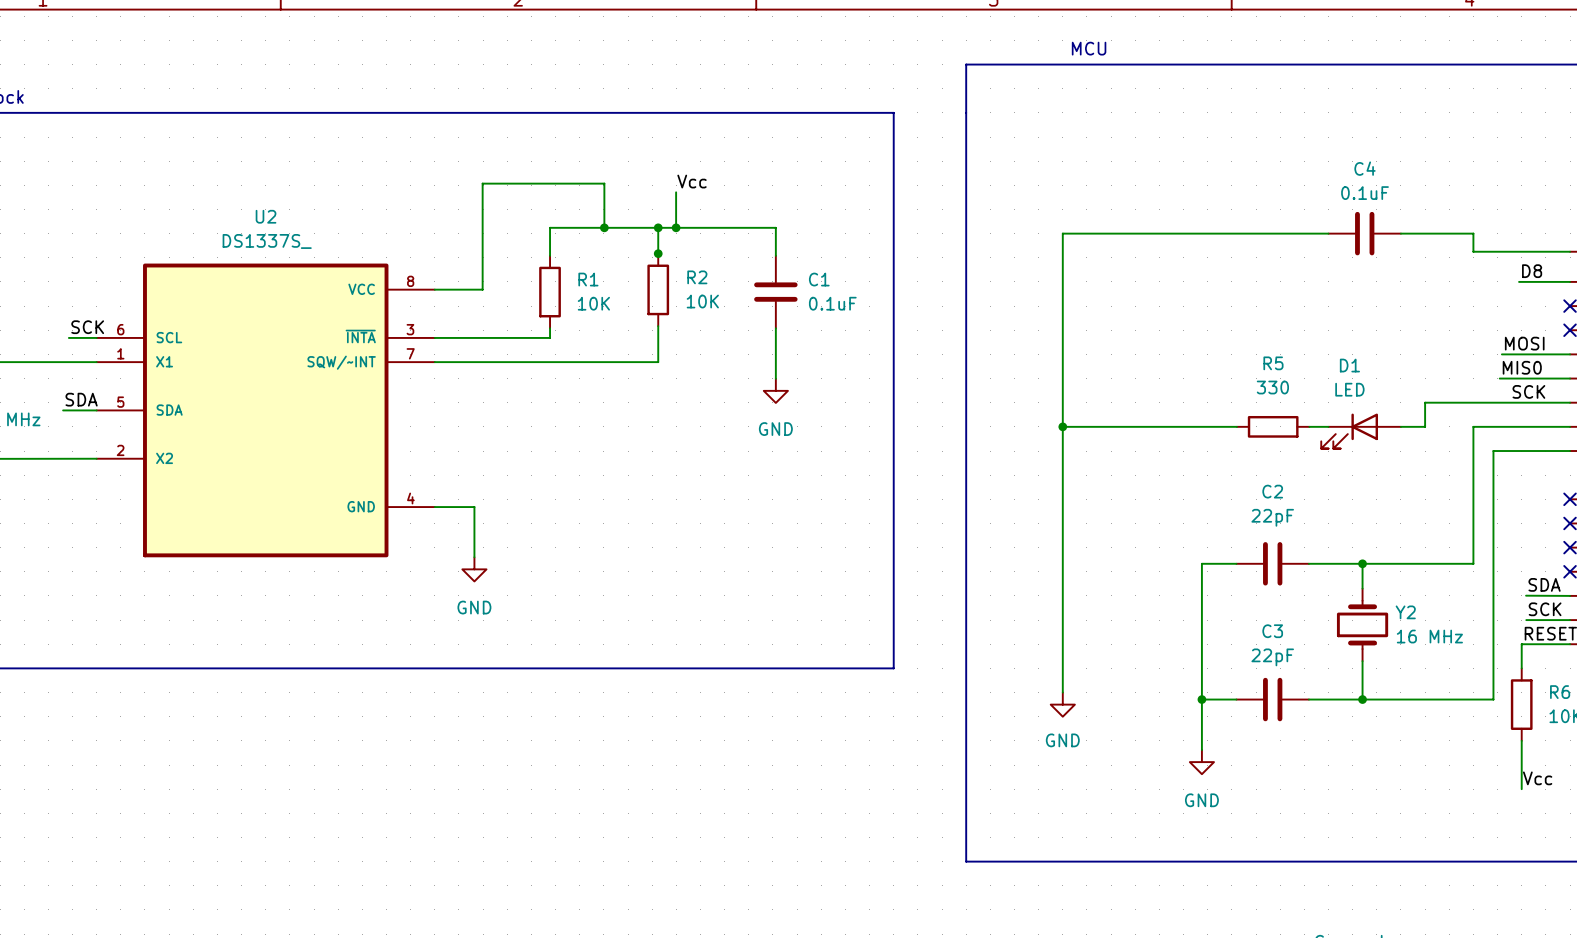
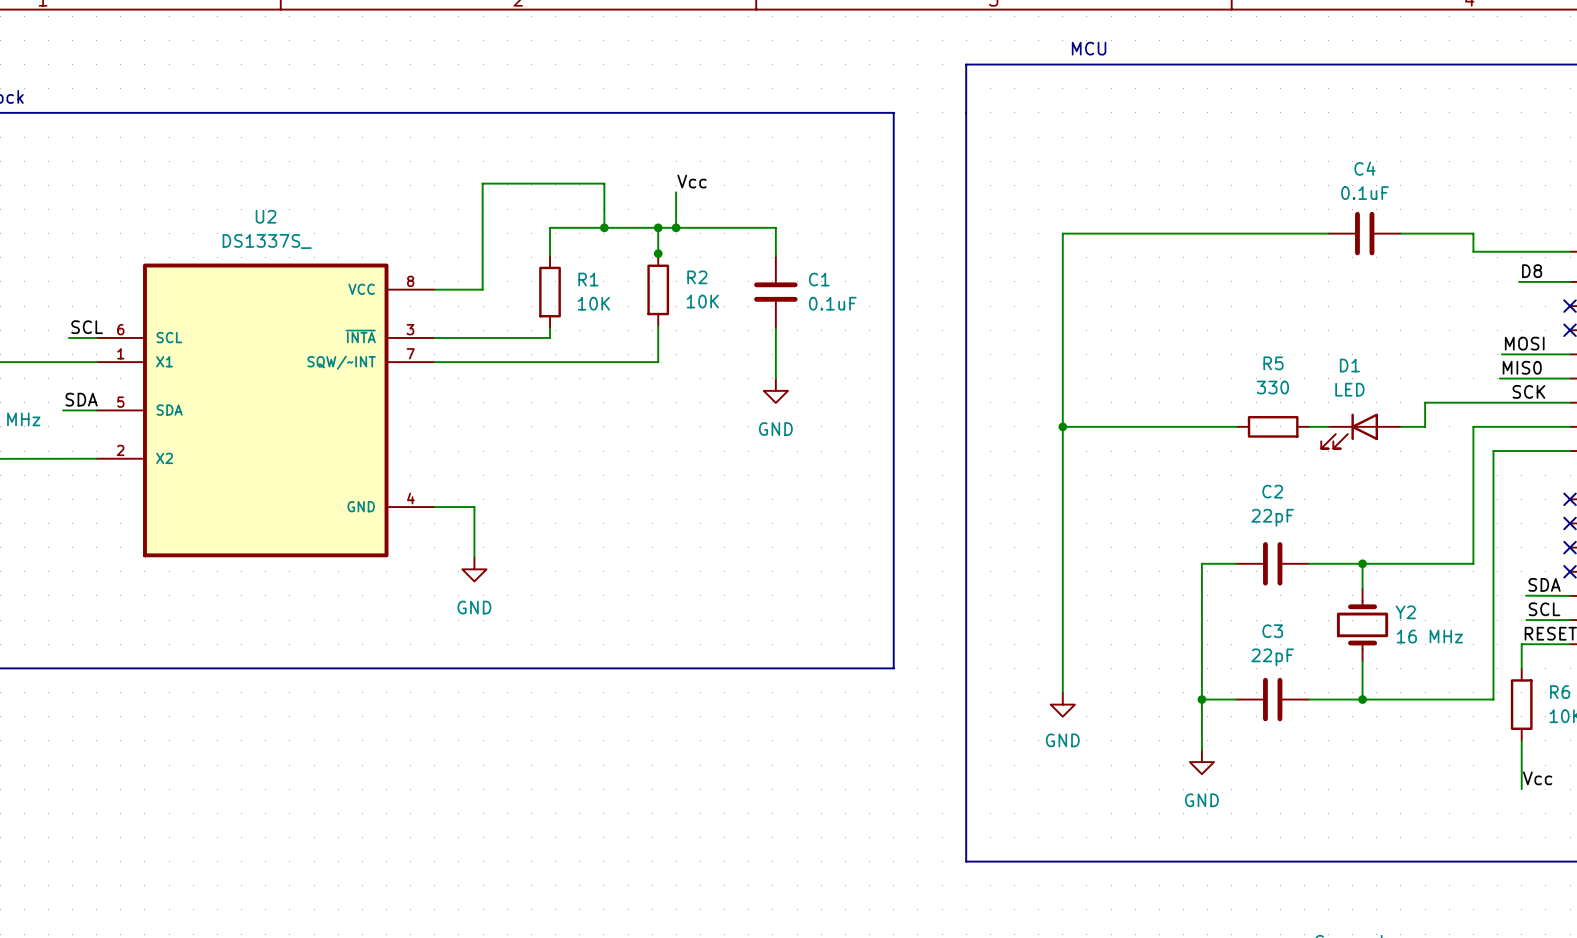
label: SCK (87, 327) -> SCL (87, 327)
label: SCK (1545, 609) -> SCL (1544, 609)

